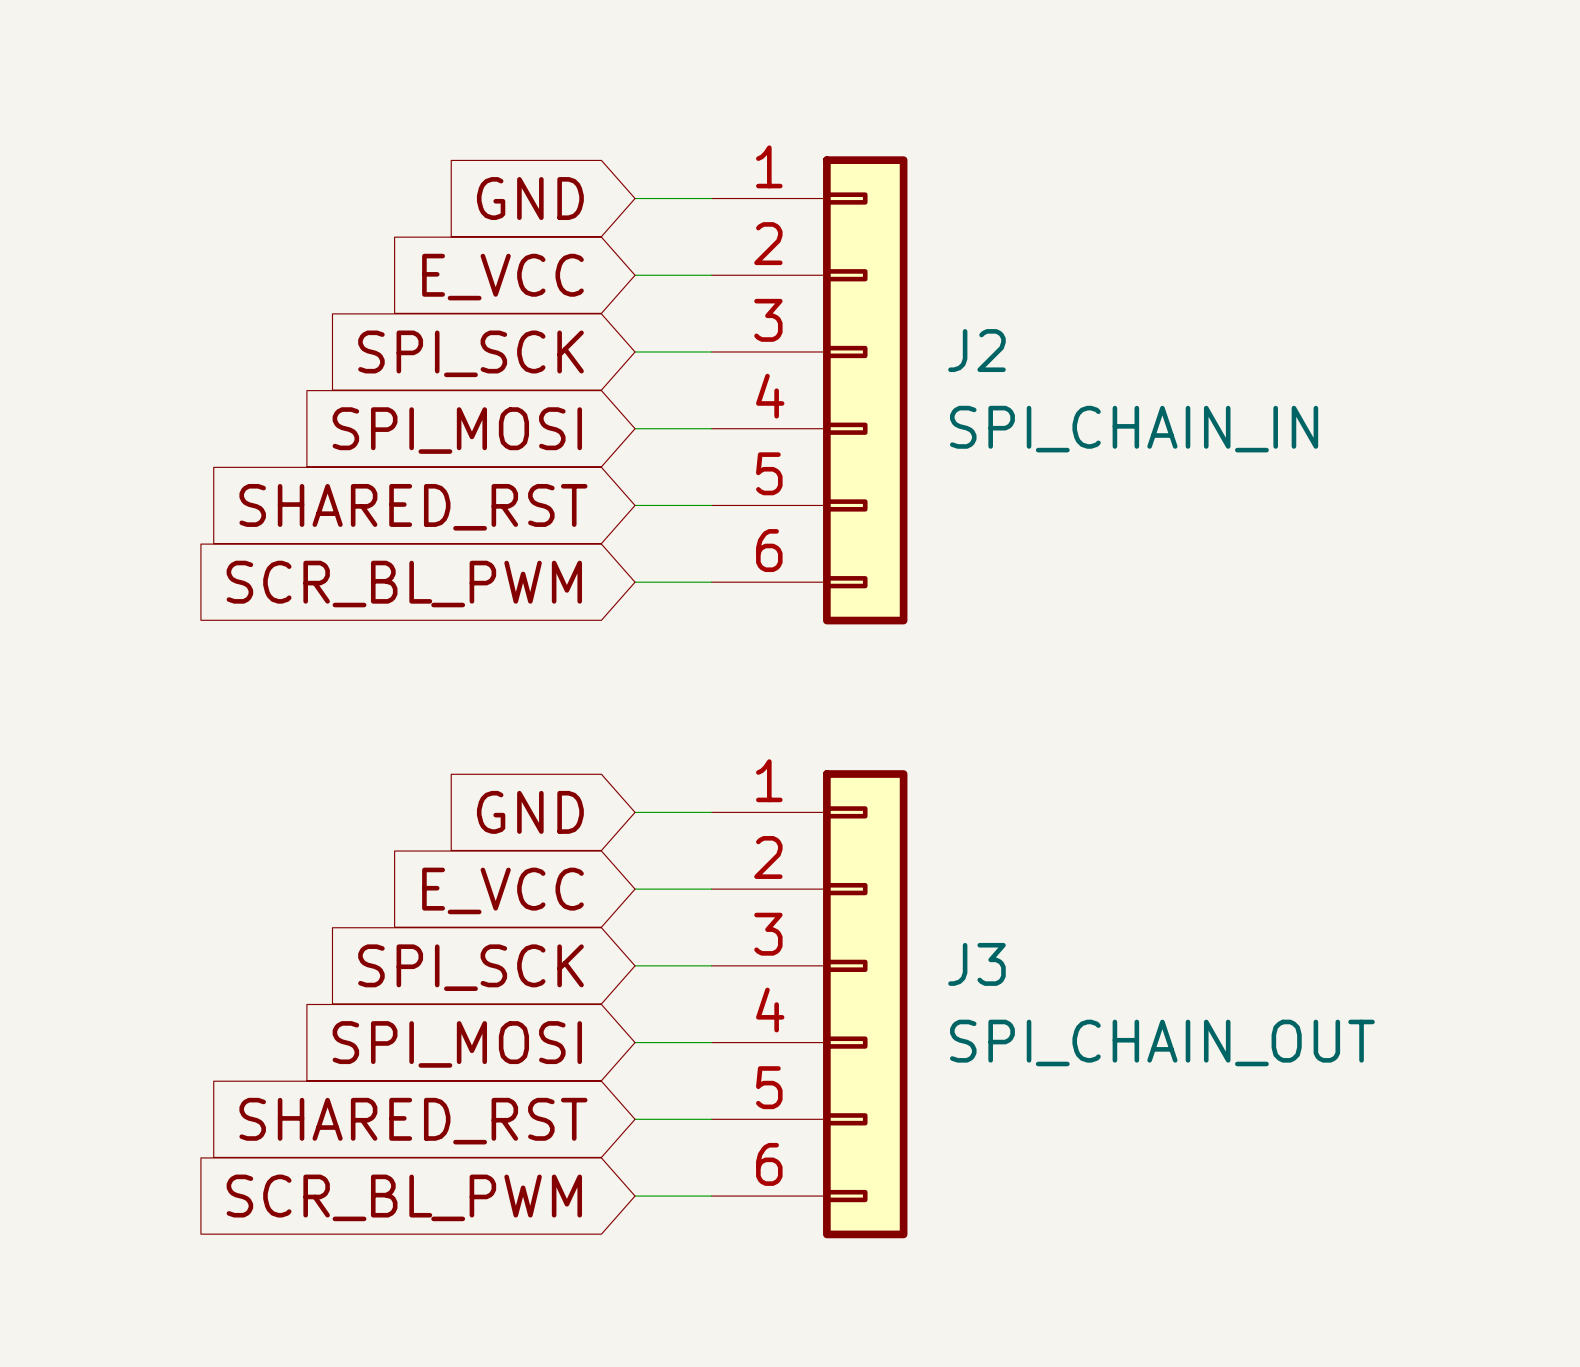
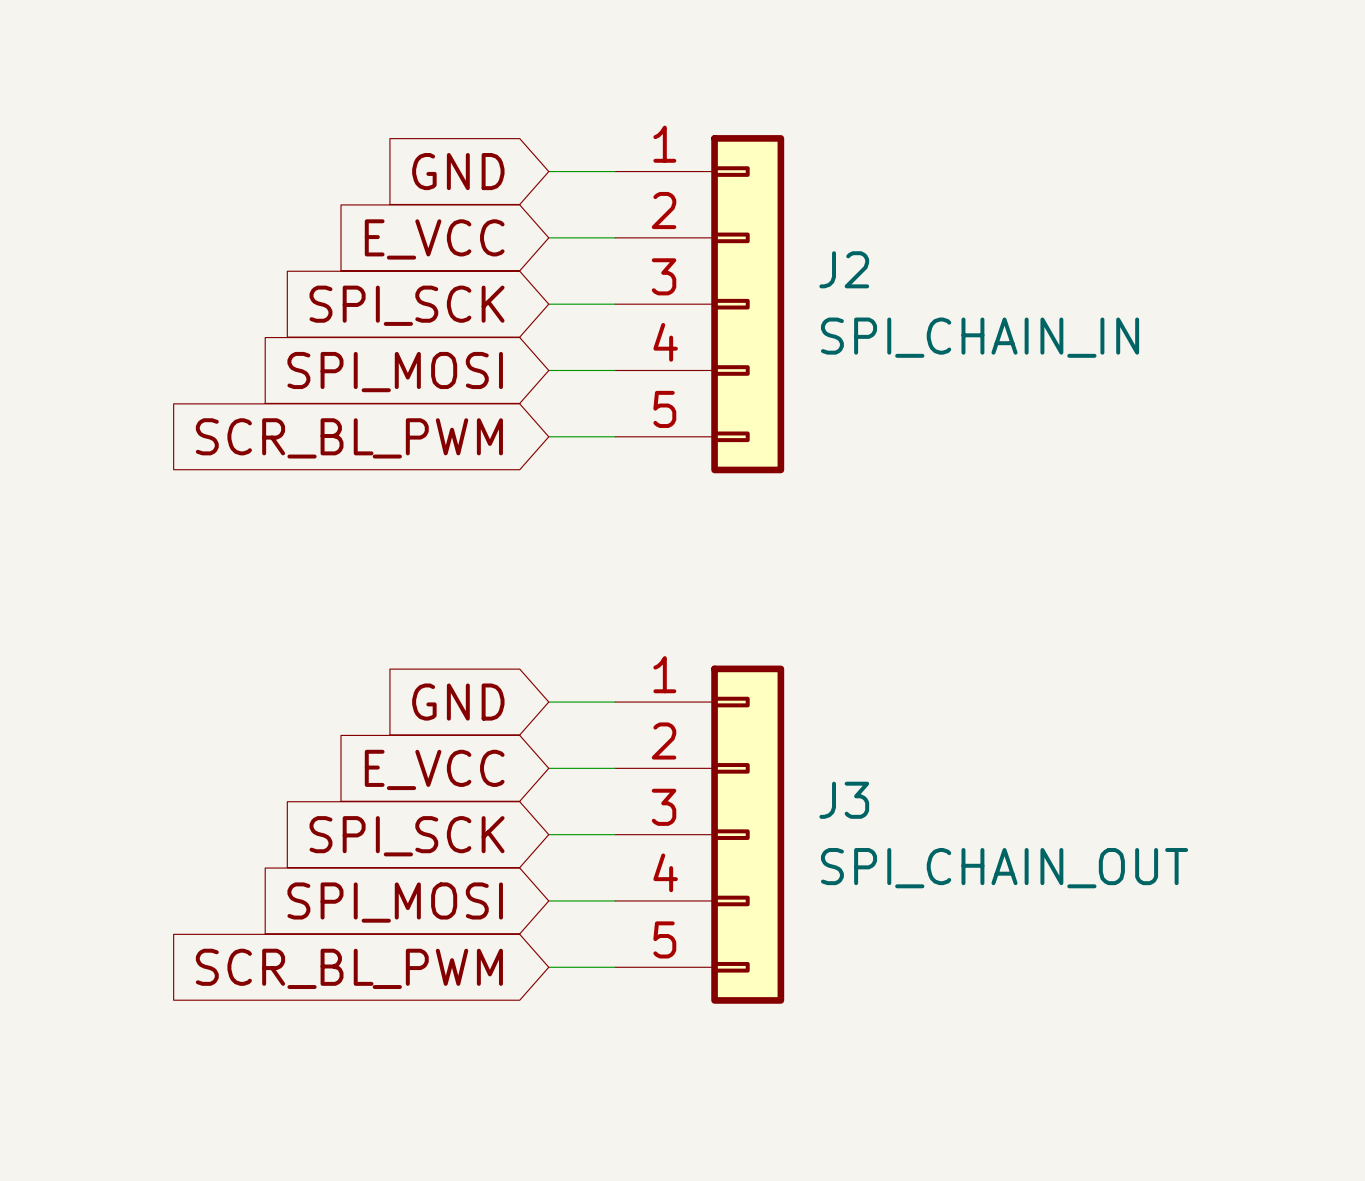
J2 symbol: [711, 156, 908, 625] -> [615, 135, 785, 474]
global label: SHARED_RST (413, 507) -> SCR_BL_PWM (349, 438)
wire: (635, 582) (711, 582) -> none
global label: SCR_BL_PWM (404, 584) -> none
J3 symbol: [711, 770, 908, 1239] -> [615, 665, 785, 1004]
global label: SHARED_RST (413, 1121) -> SCR_BL_PWM (349, 968)
wire: (635, 1196) (711, 1196) -> none
global label: SCR_BL_PWM (404, 1197) -> none

